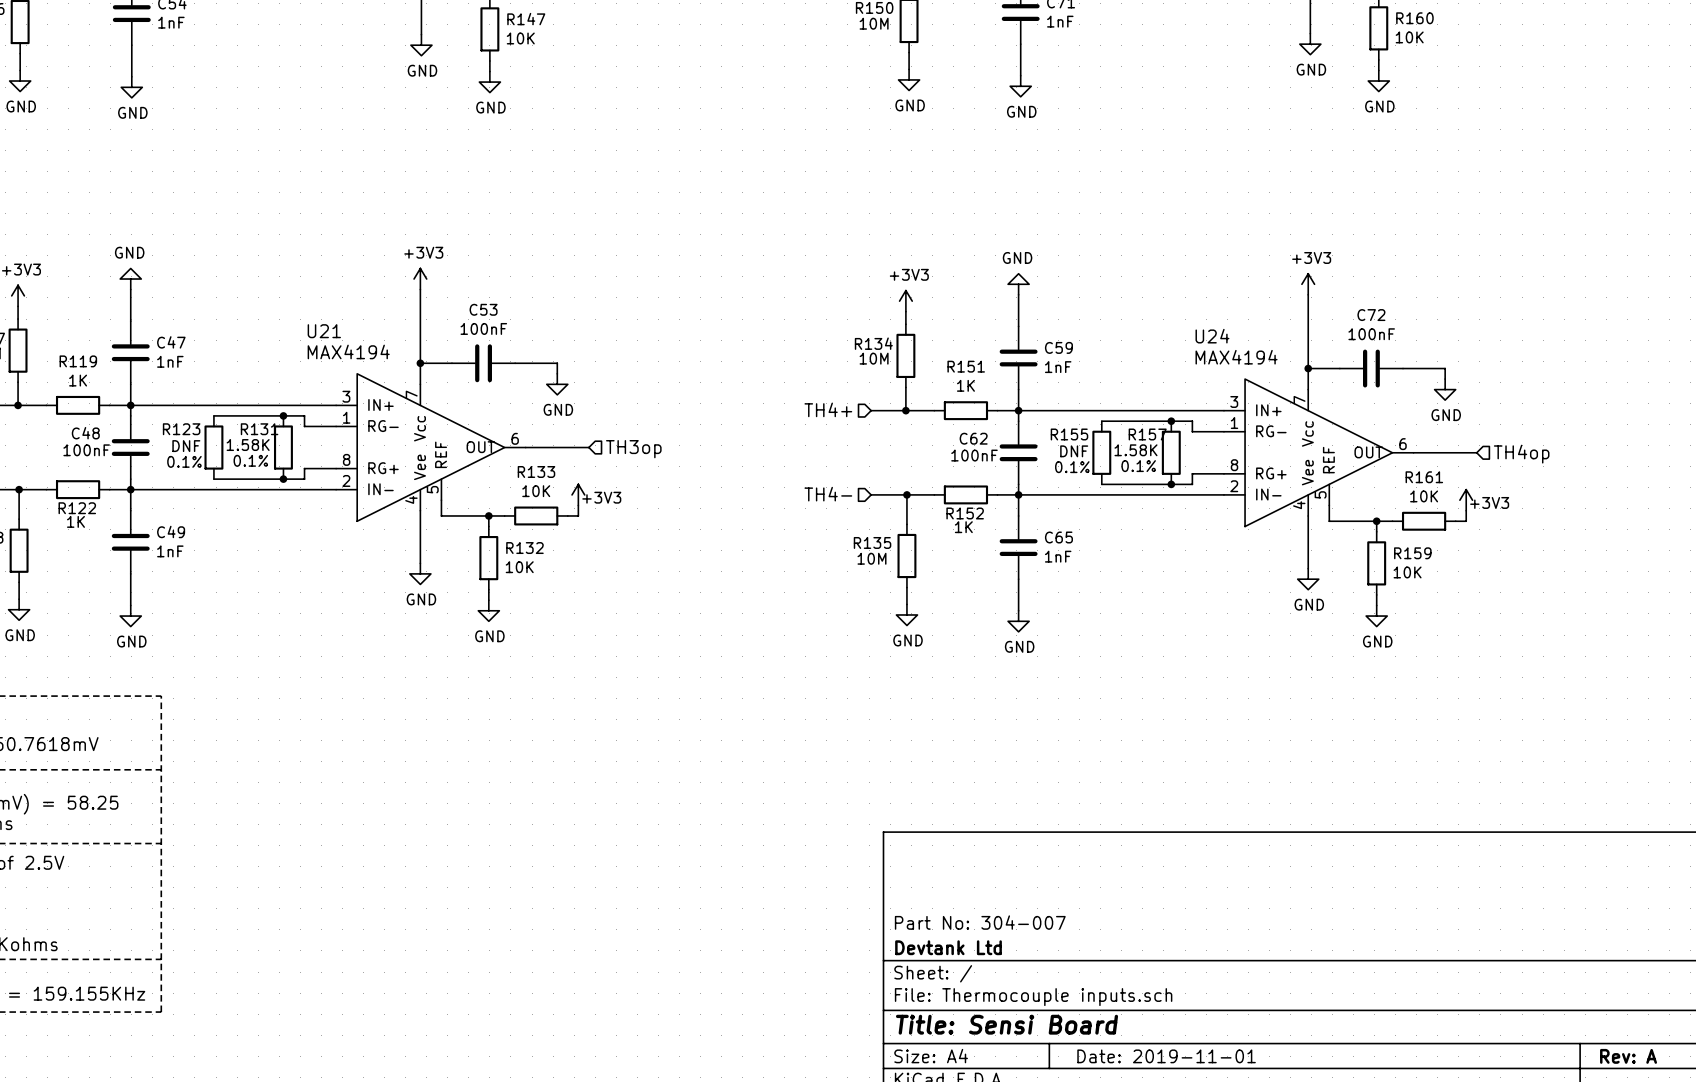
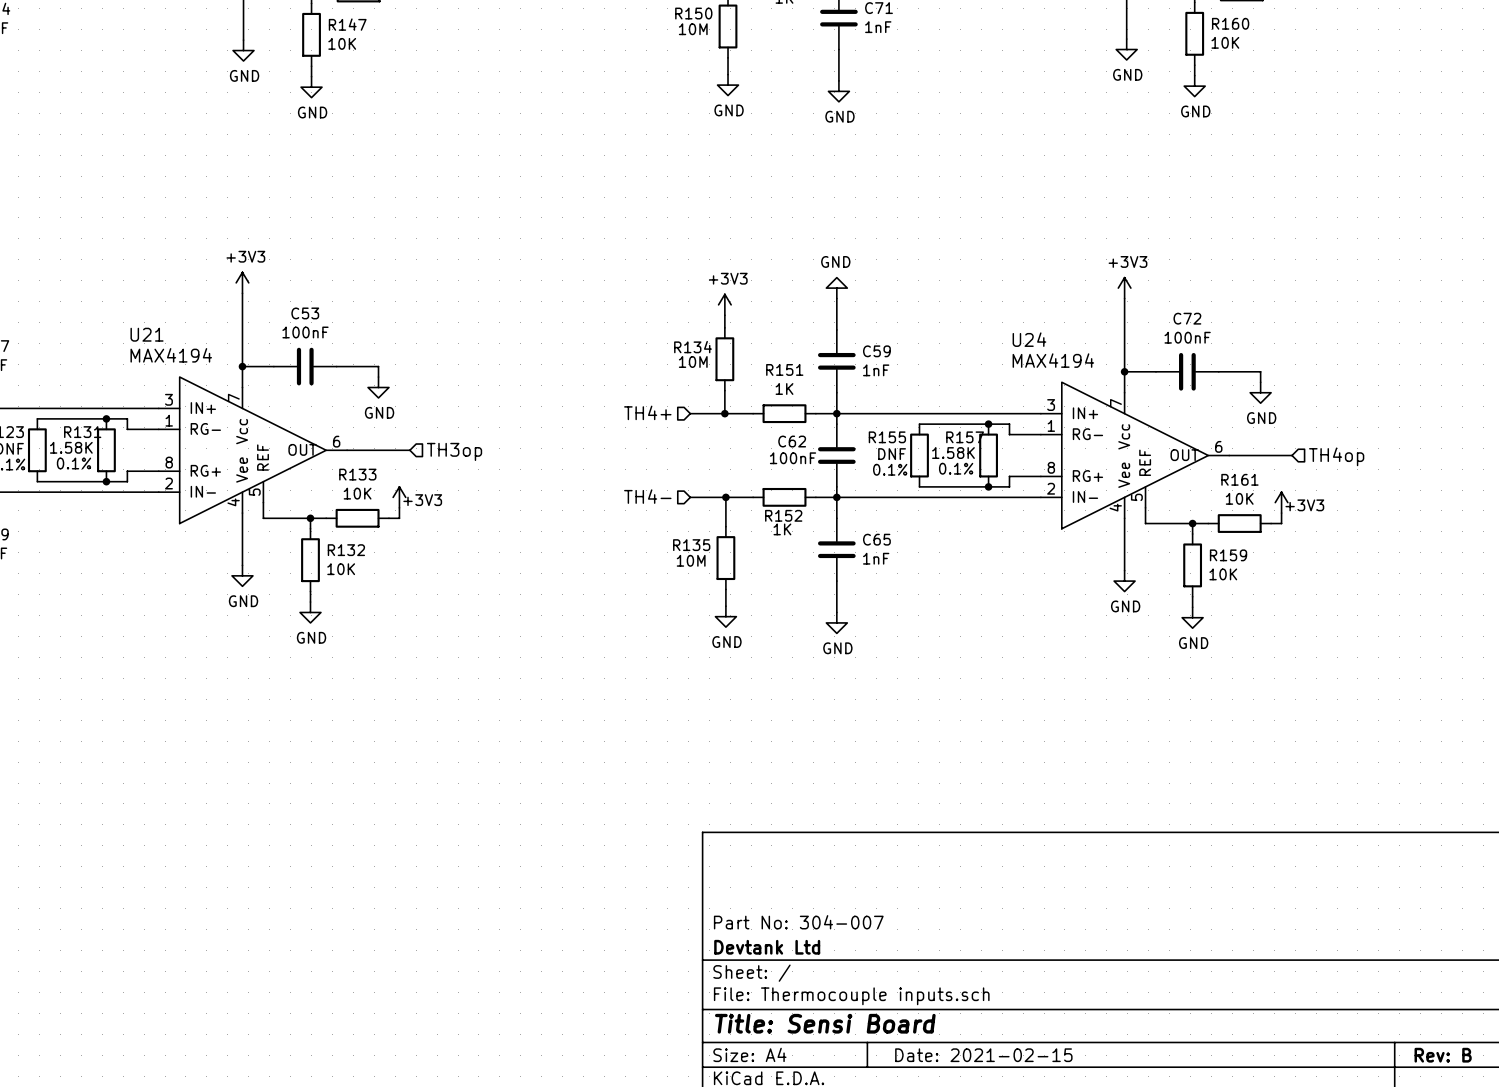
title block: Date: 2019-11-01 (1166, 1056) -> Date: 2021-02-15 (983, 1055)
title block: Rev: A (1628, 1056) -> Rev: B (1443, 1055)

